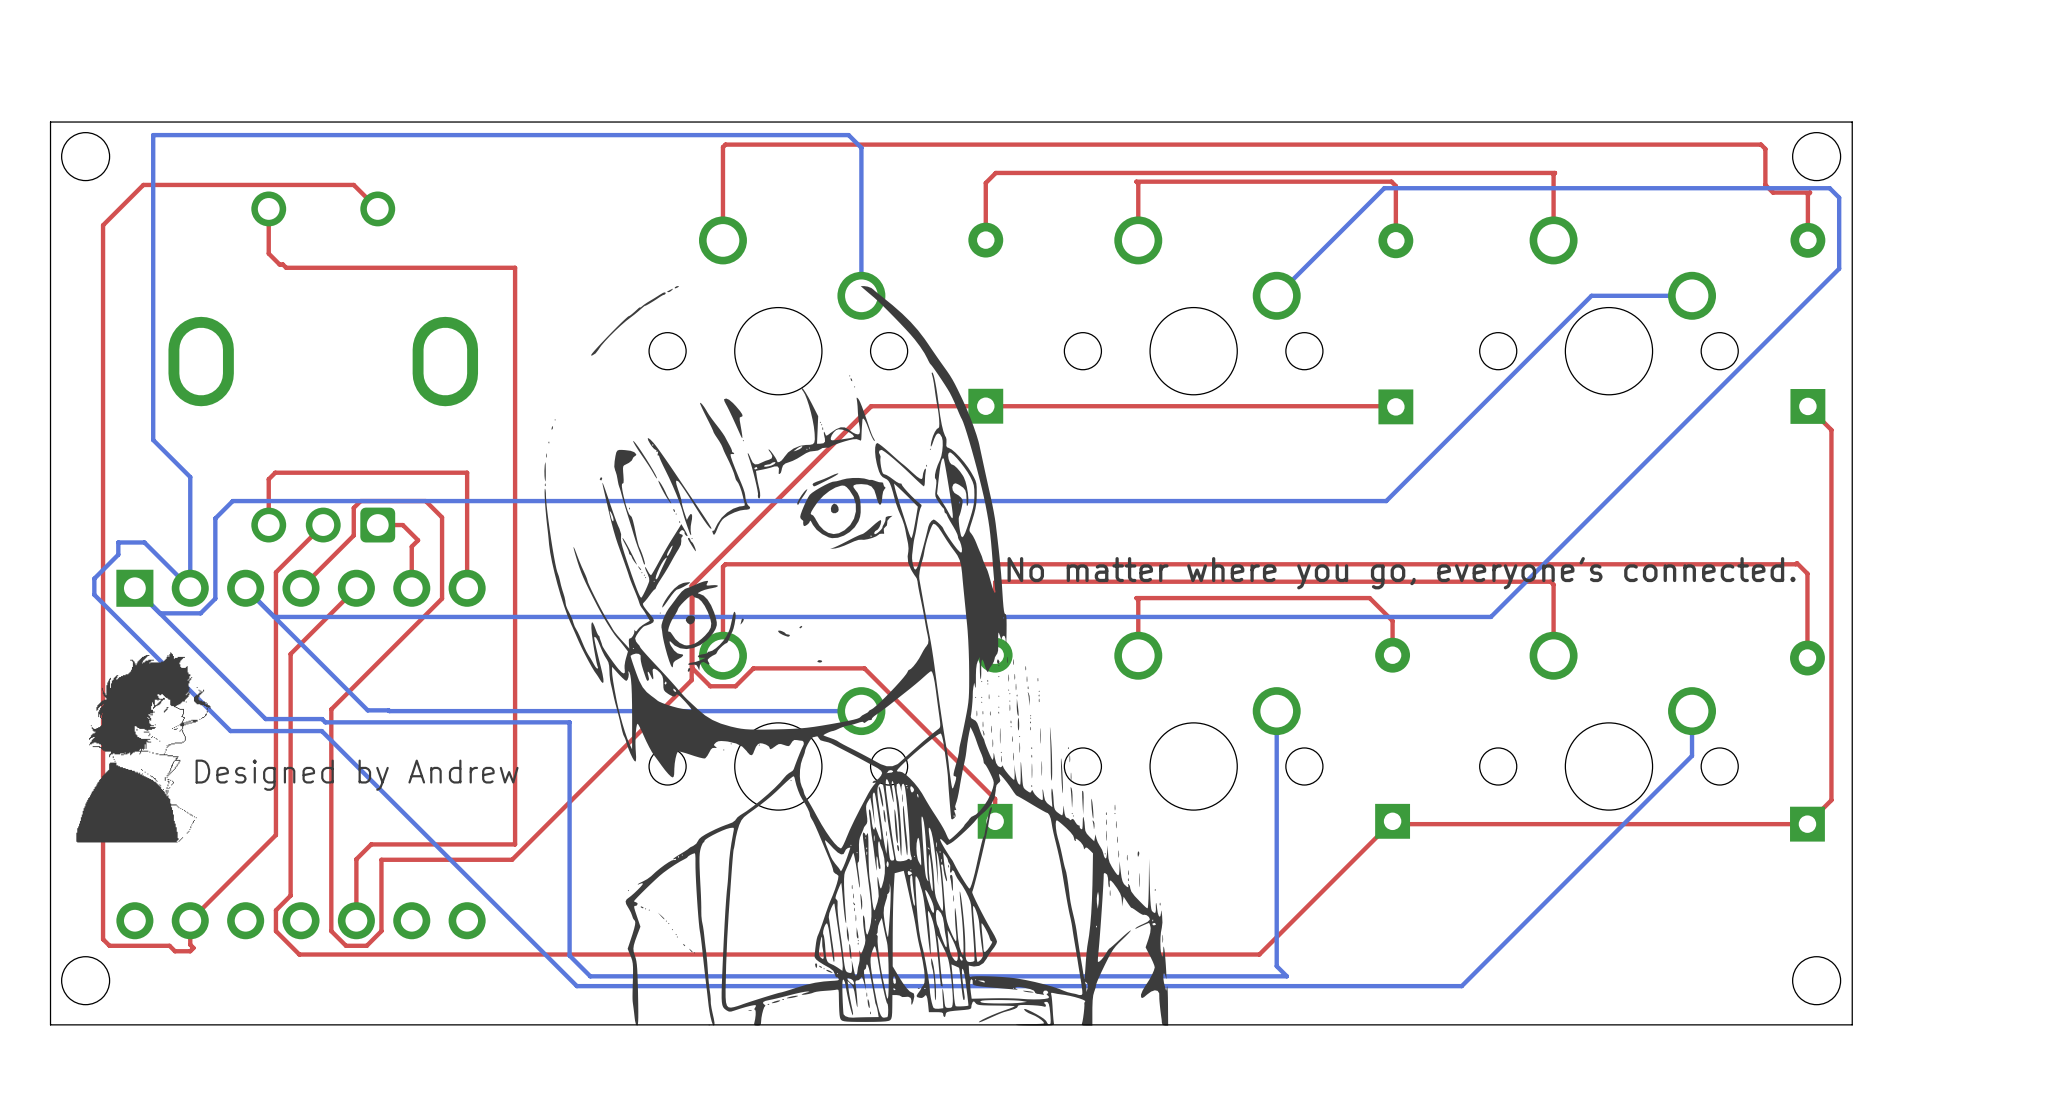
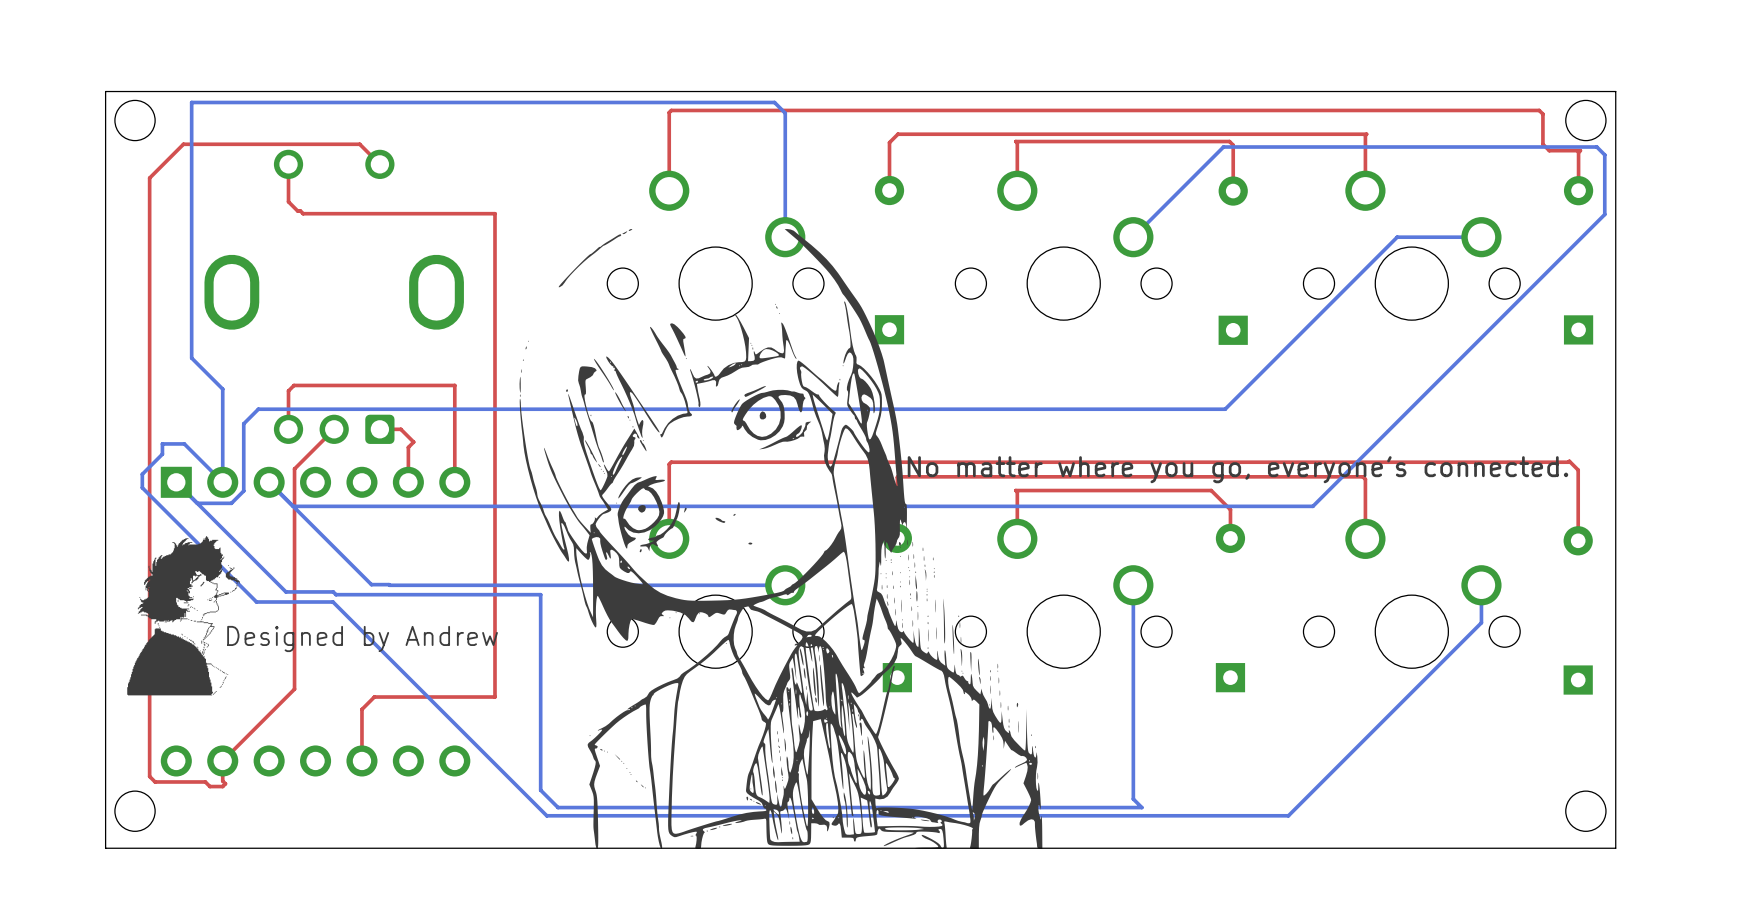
top track: (1395, 406) (871, 406) (691, 585) (691, 680) (512, 859) (381, 859) (381, 931) (366, 945) (346, 945) (331, 931) (331, 709) (442, 598) (442, 517) (425, 501) (360, 501) (353, 507) (353, 535) (301, 588) -> none
top track: (1807, 406) (1831, 429) (1831, 800) (1807, 824) (1395, 824) (1392, 821) (1259, 954) (299, 954) (275, 931) (275, 910) (290, 895) (290, 654) (356, 588) -> none
top track: (692, 584) (692, 668) (710, 686) (735, 686) (753, 668) (864, 668) (995, 799) (995, 821) -> none

